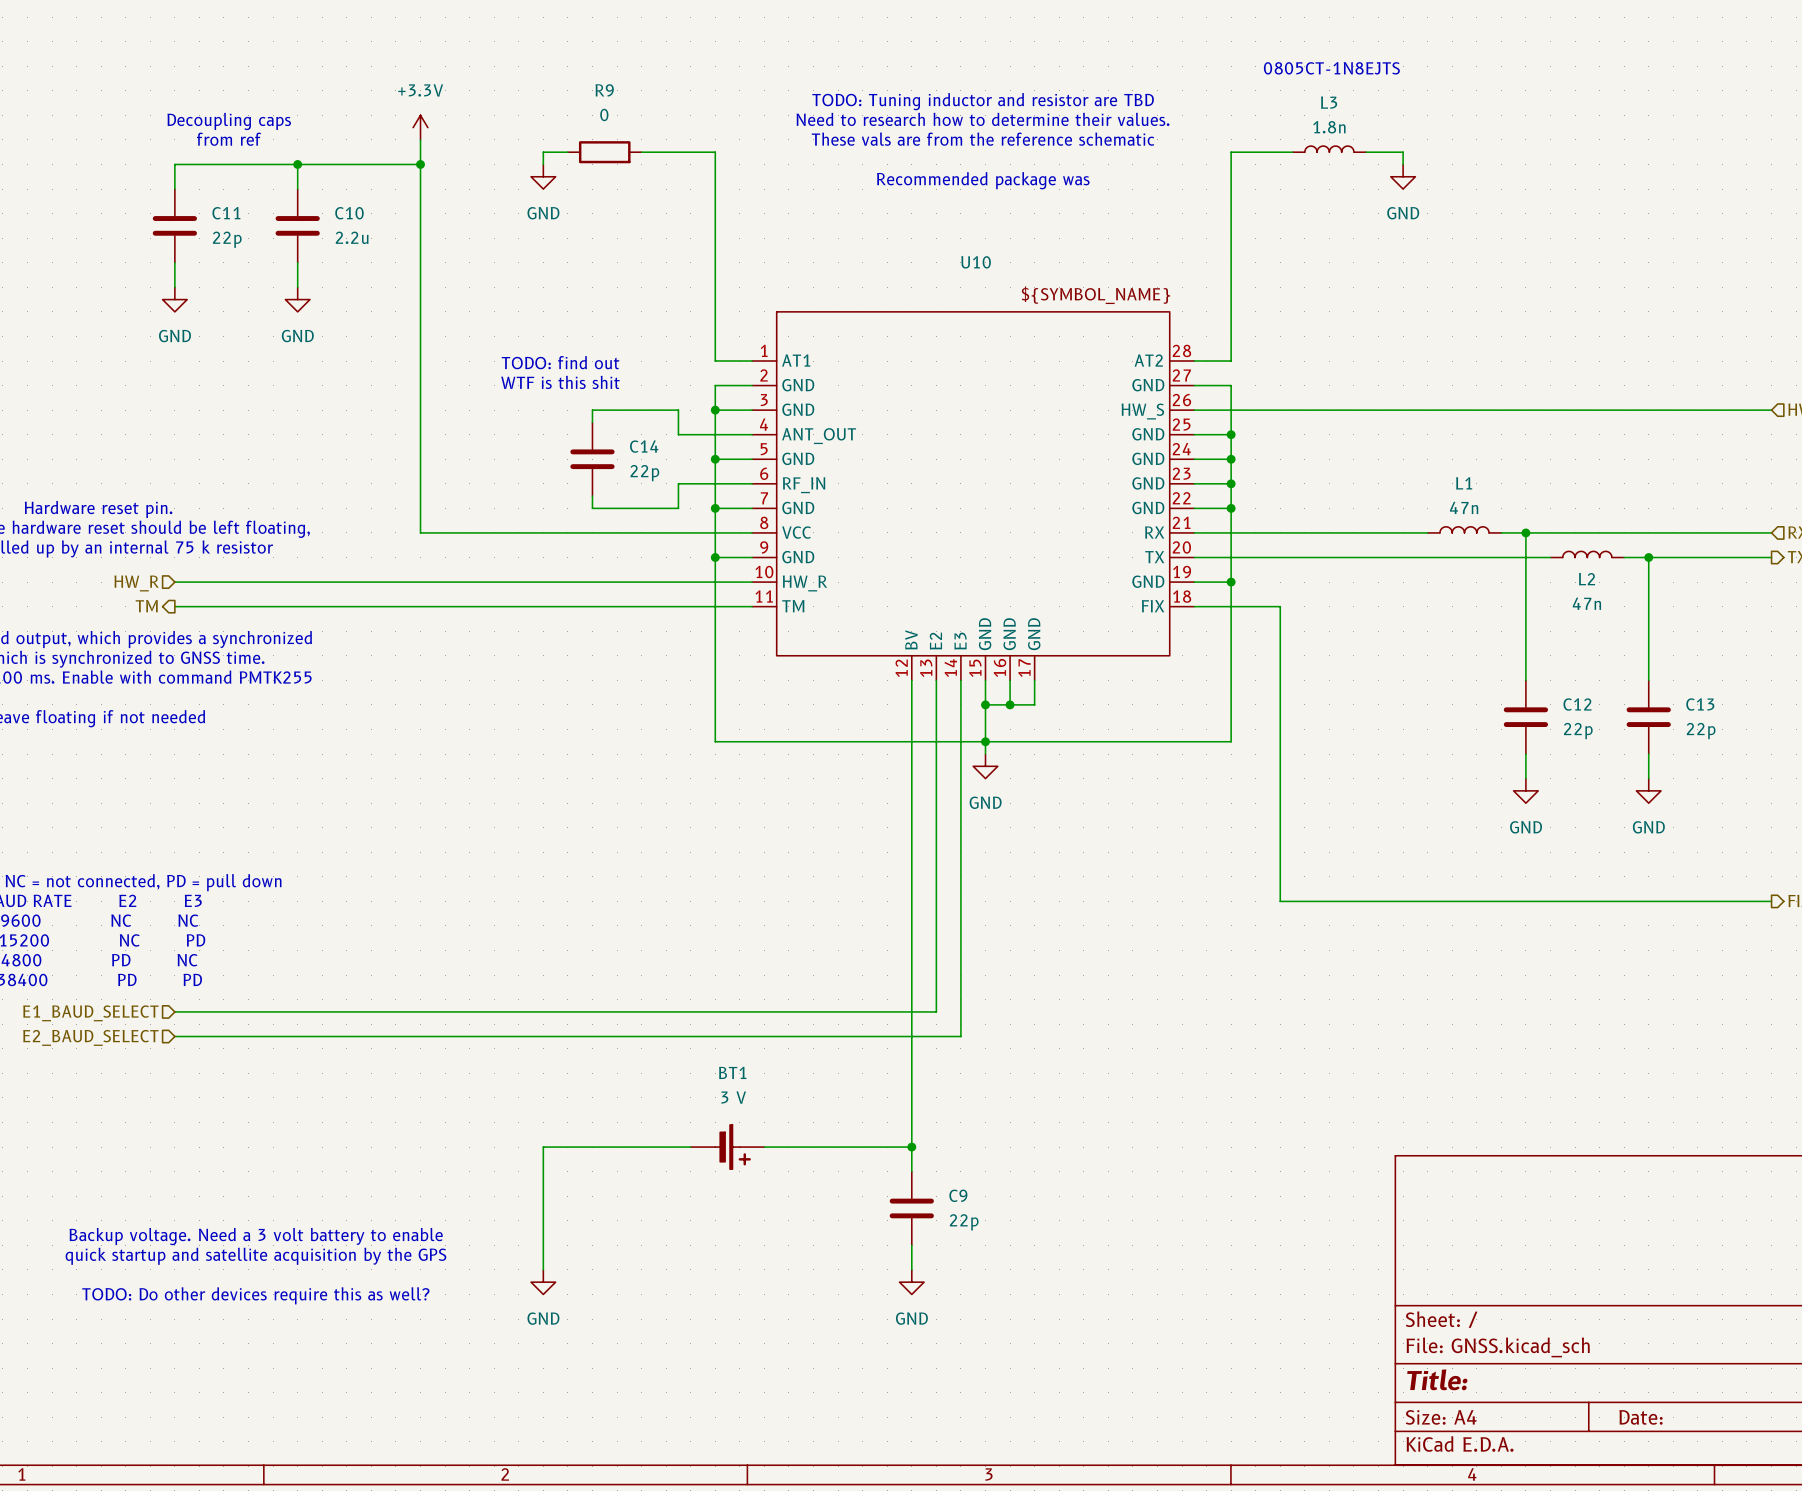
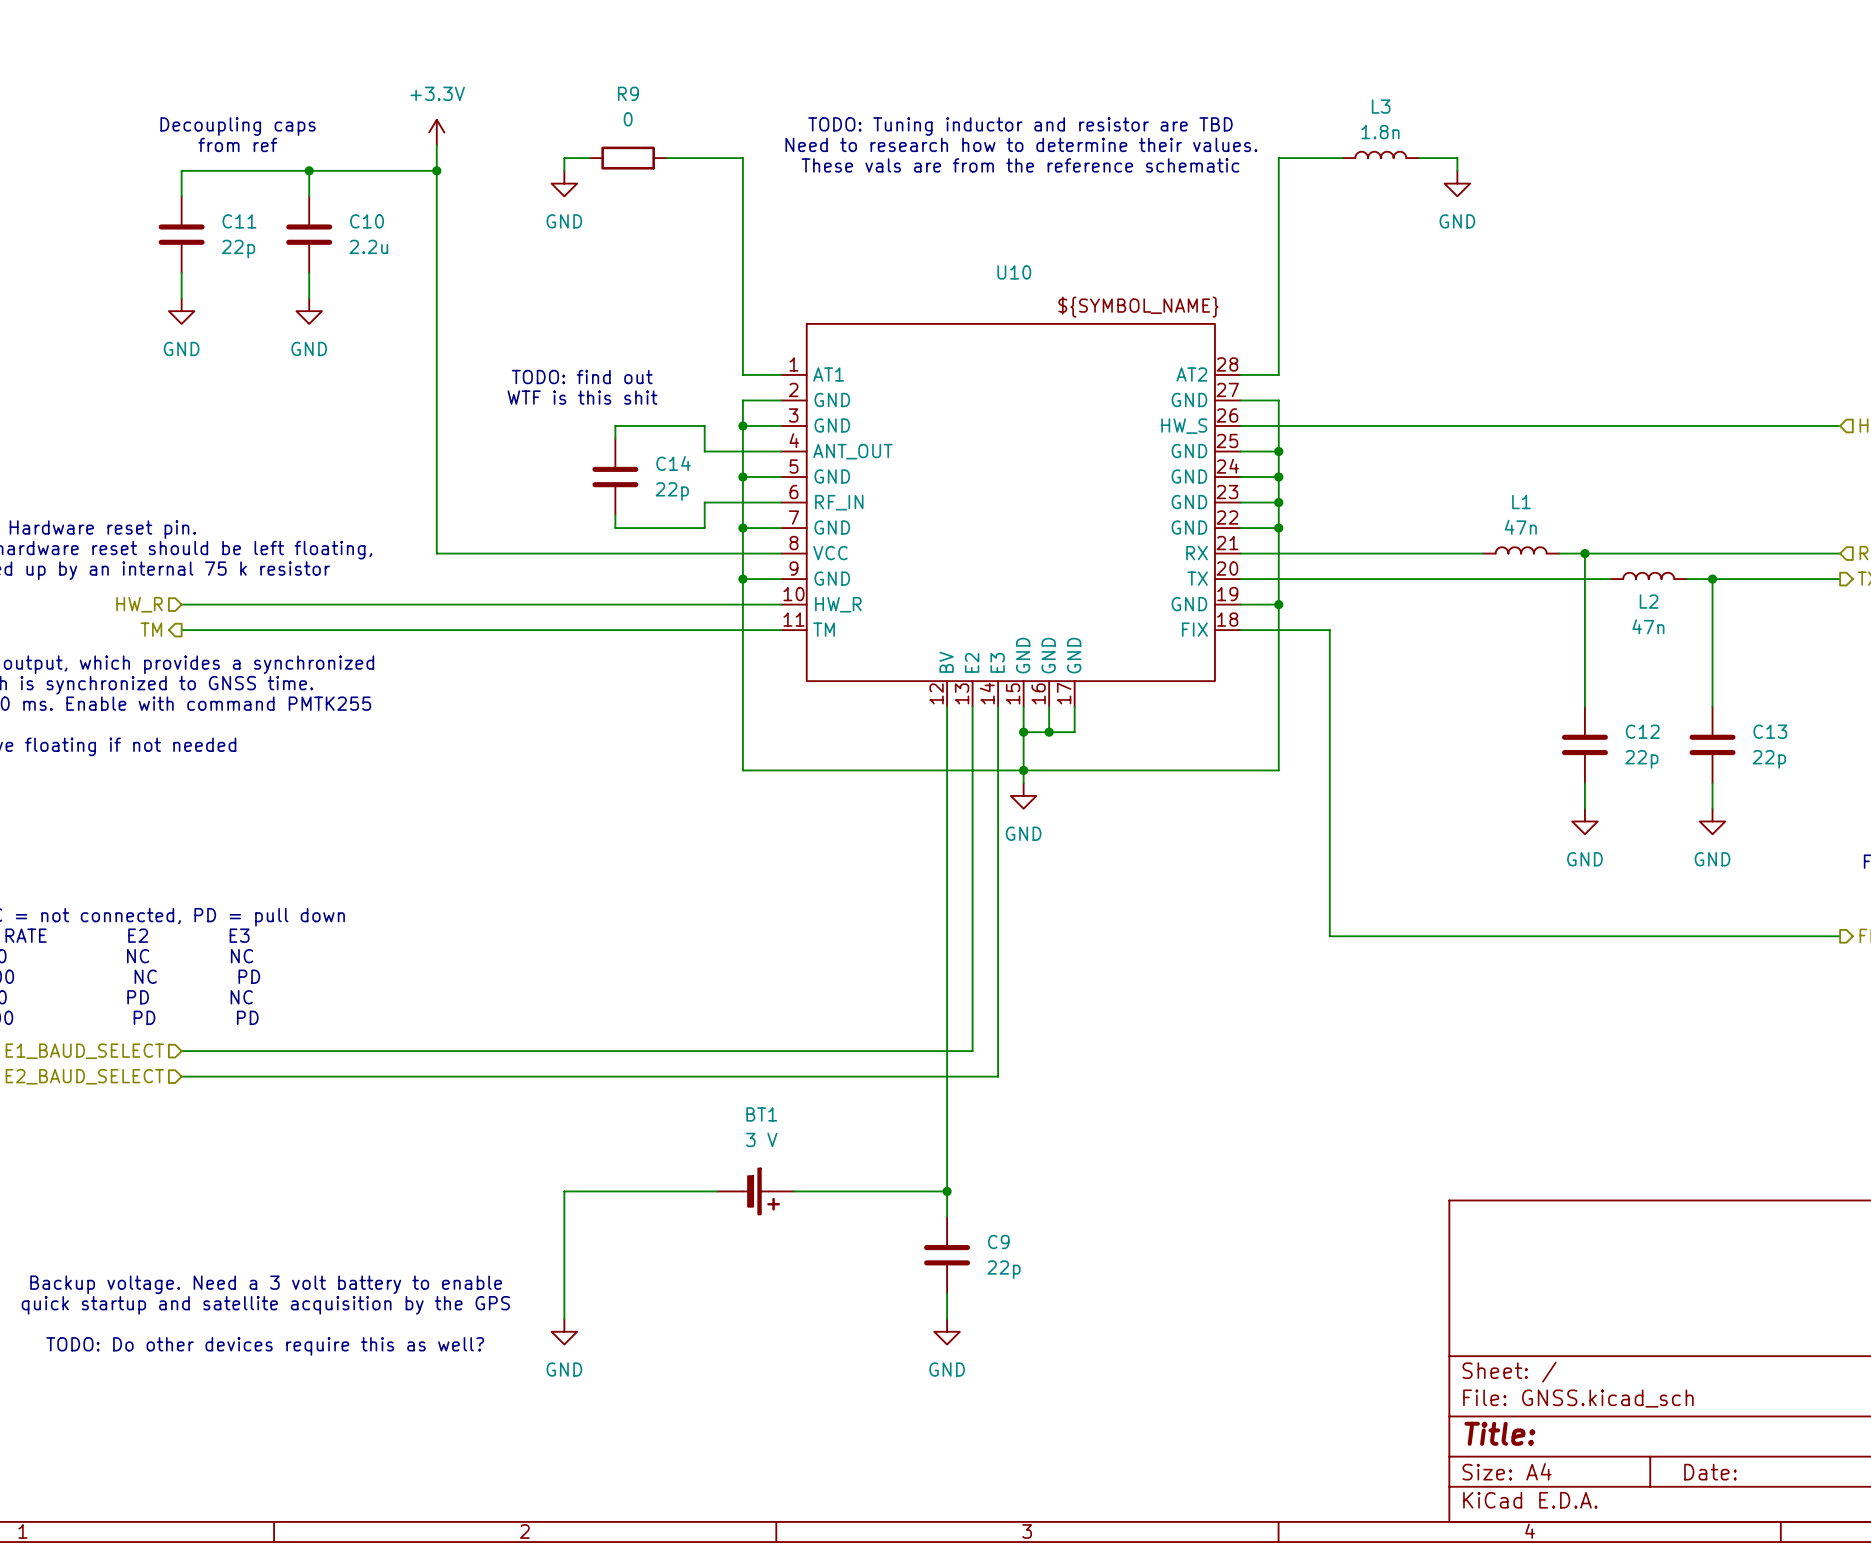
text: 0805CT-1N8EJTS (1331, 68) -> none
text: TODO: Tuning inductor and resistor are TBD (983, 101) -> none
text: Need to research how to determine their values. (982, 119) -> TODO: Tuning inductor and resistor are TBD (1020, 126)
text: These vals are from the reference schematic (982, 139) -> Need to research how to determine their values. (1021, 144)
text: none -> These vals are from the reference schematic (1020, 165)
text: Recommended package was (983, 180) -> none

